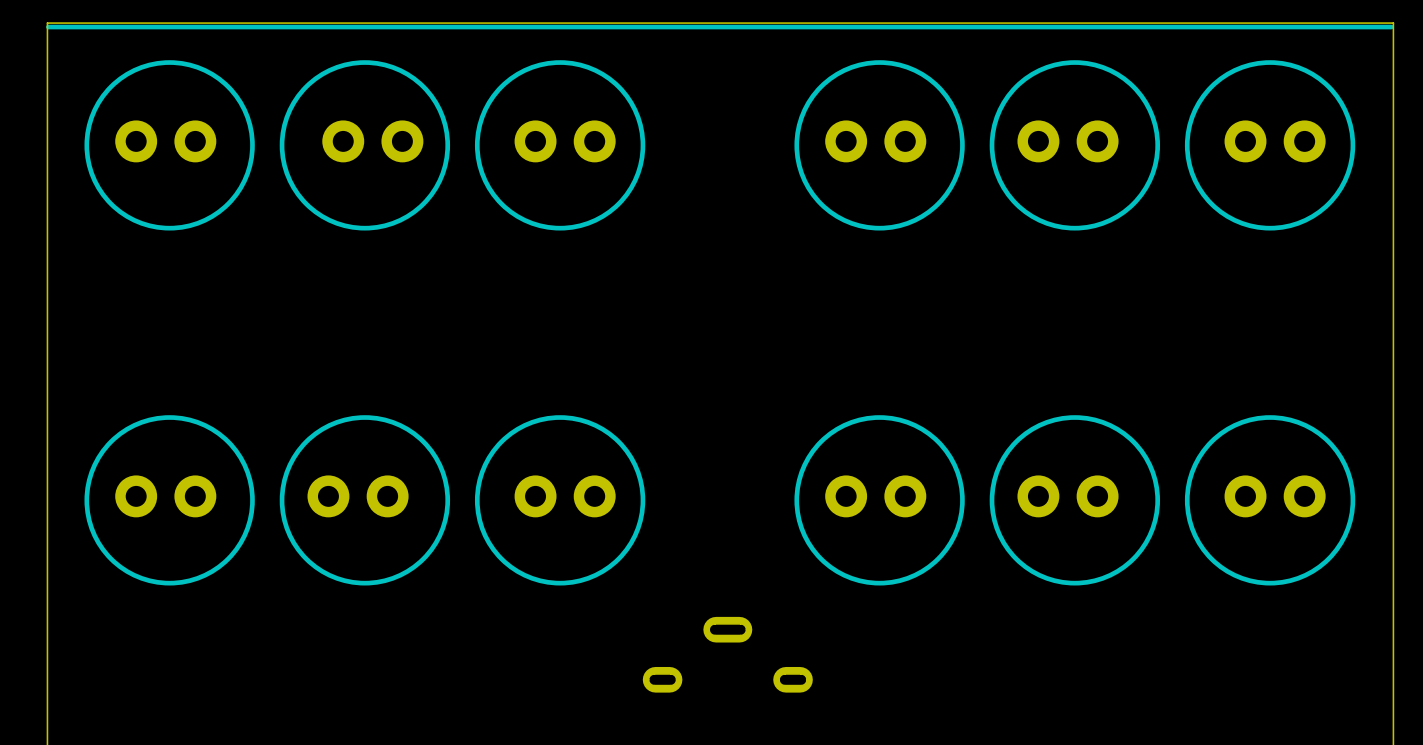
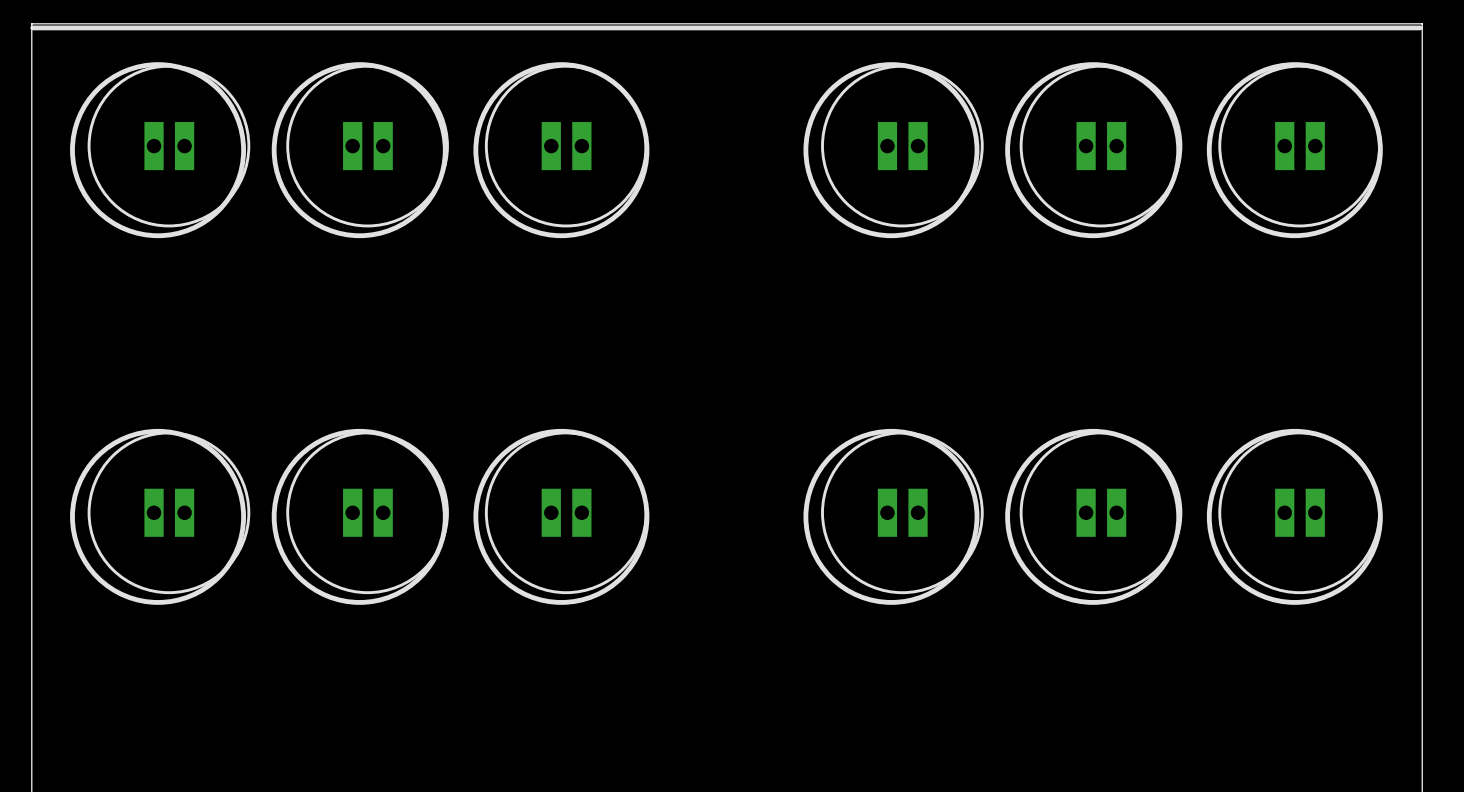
part footprint: [115, 120, 217, 163] -> [87, 64, 251, 228]
part footprint: [322, 120, 424, 163] -> [286, 64, 449, 228]
part footprint: [514, 120, 616, 163] -> [484, 64, 648, 228]
part footprint: [825, 120, 927, 163] -> [821, 64, 984, 228]
part footprint: [1017, 120, 1119, 163] -> [1019, 64, 1183, 228]
part footprint: [1224, 120, 1326, 163] -> [1218, 64, 1381, 228]
part footprint: [115, 475, 217, 518] -> [87, 431, 251, 595]
part footprint: [307, 475, 409, 518] -> [286, 431, 449, 595]
part footprint: [514, 475, 616, 518] -> [484, 431, 648, 595]
part footprint: [825, 475, 927, 518] -> [821, 431, 984, 595]
part footprint: [1017, 475, 1119, 518] -> [1019, 431, 1183, 595]
part footprint: [1224, 475, 1326, 518] -> [1218, 431, 1381, 595]
part: (727, 654) -> none

